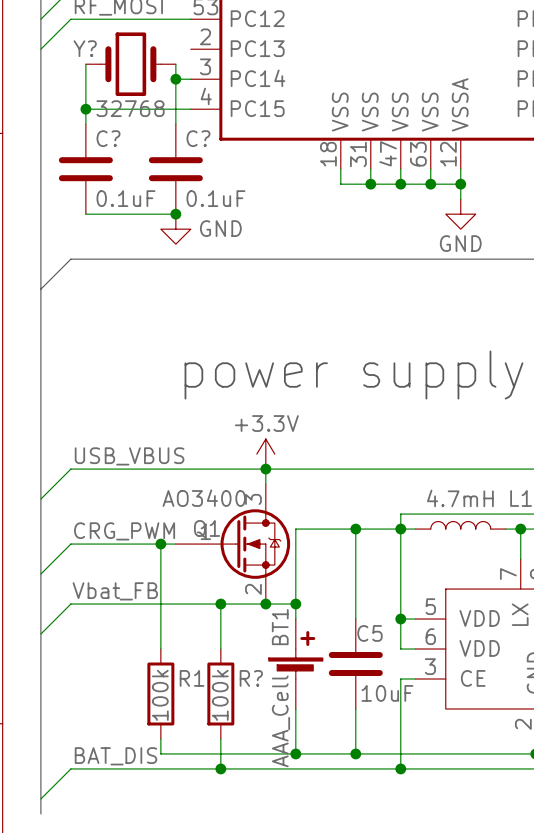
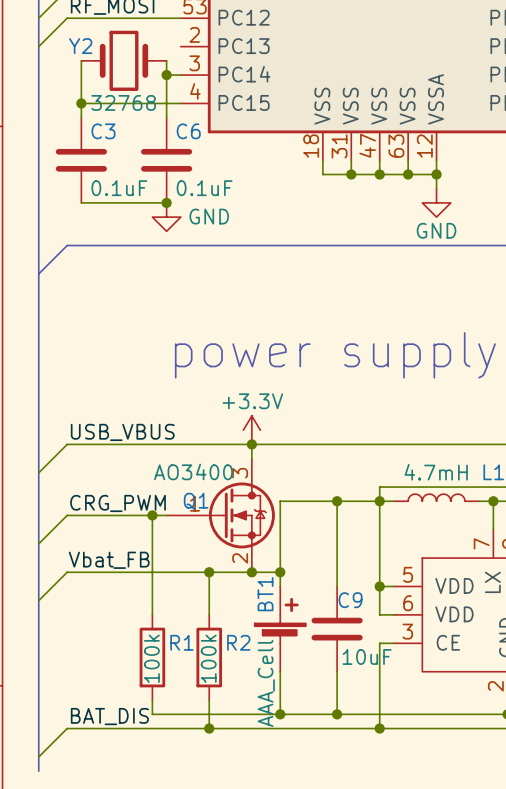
Y? name: Y? (85, 48) -> Y2 (80, 46)
C? name: C? (108, 138) -> C3 (103, 131)
C? name: C? (198, 138) -> C6 (188, 131)
C5 name: C5 (369, 633) -> C9 (350, 600)
R? name: R? (251, 678) -> R2 (238, 642)

